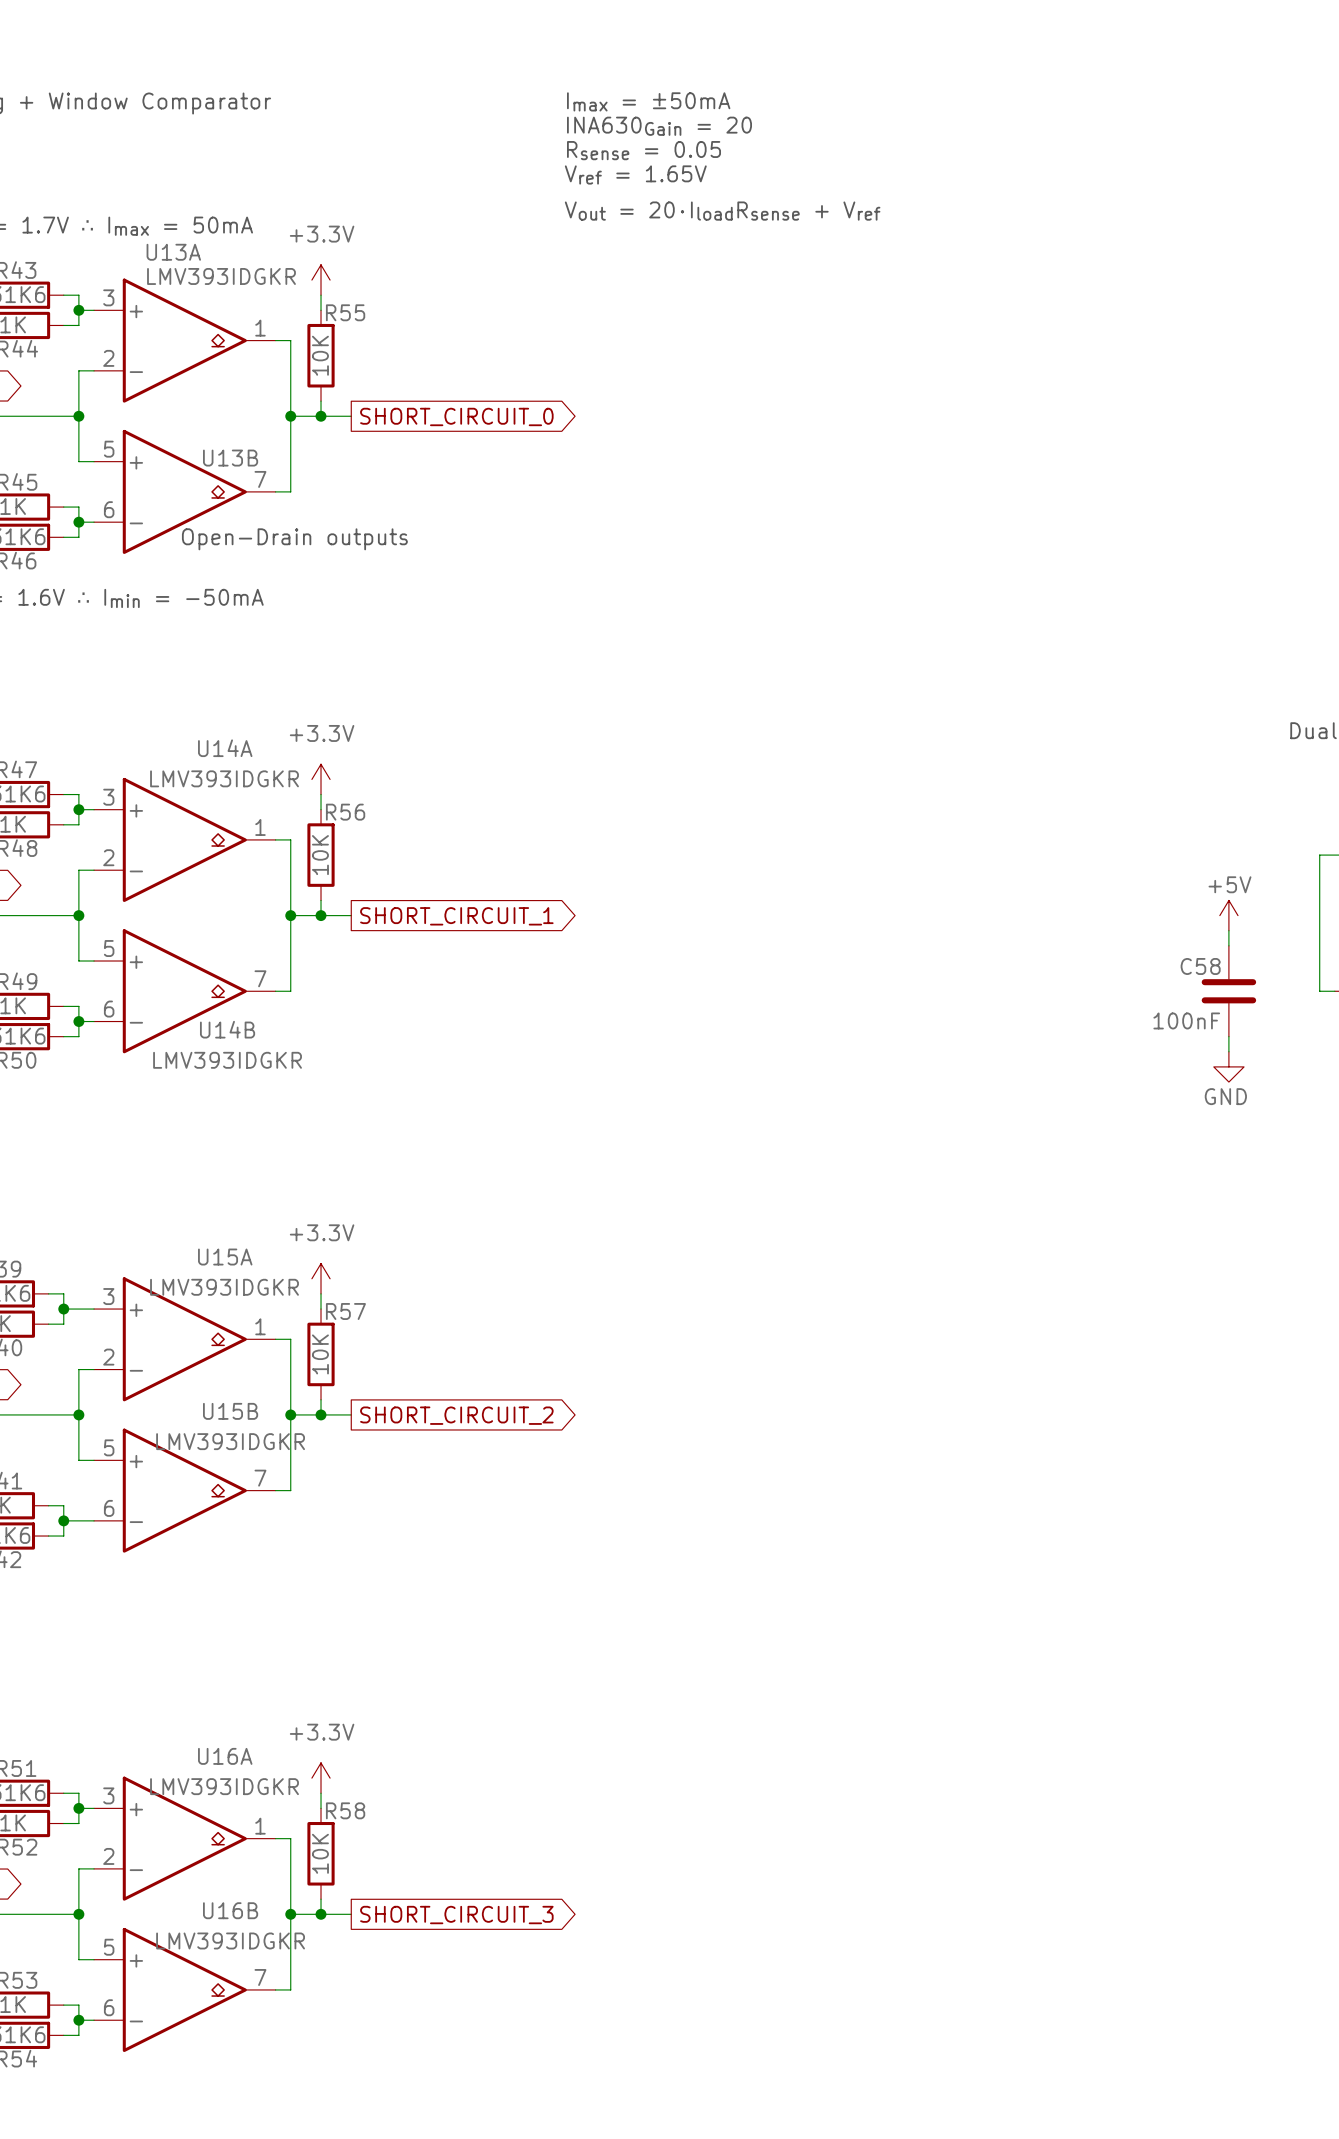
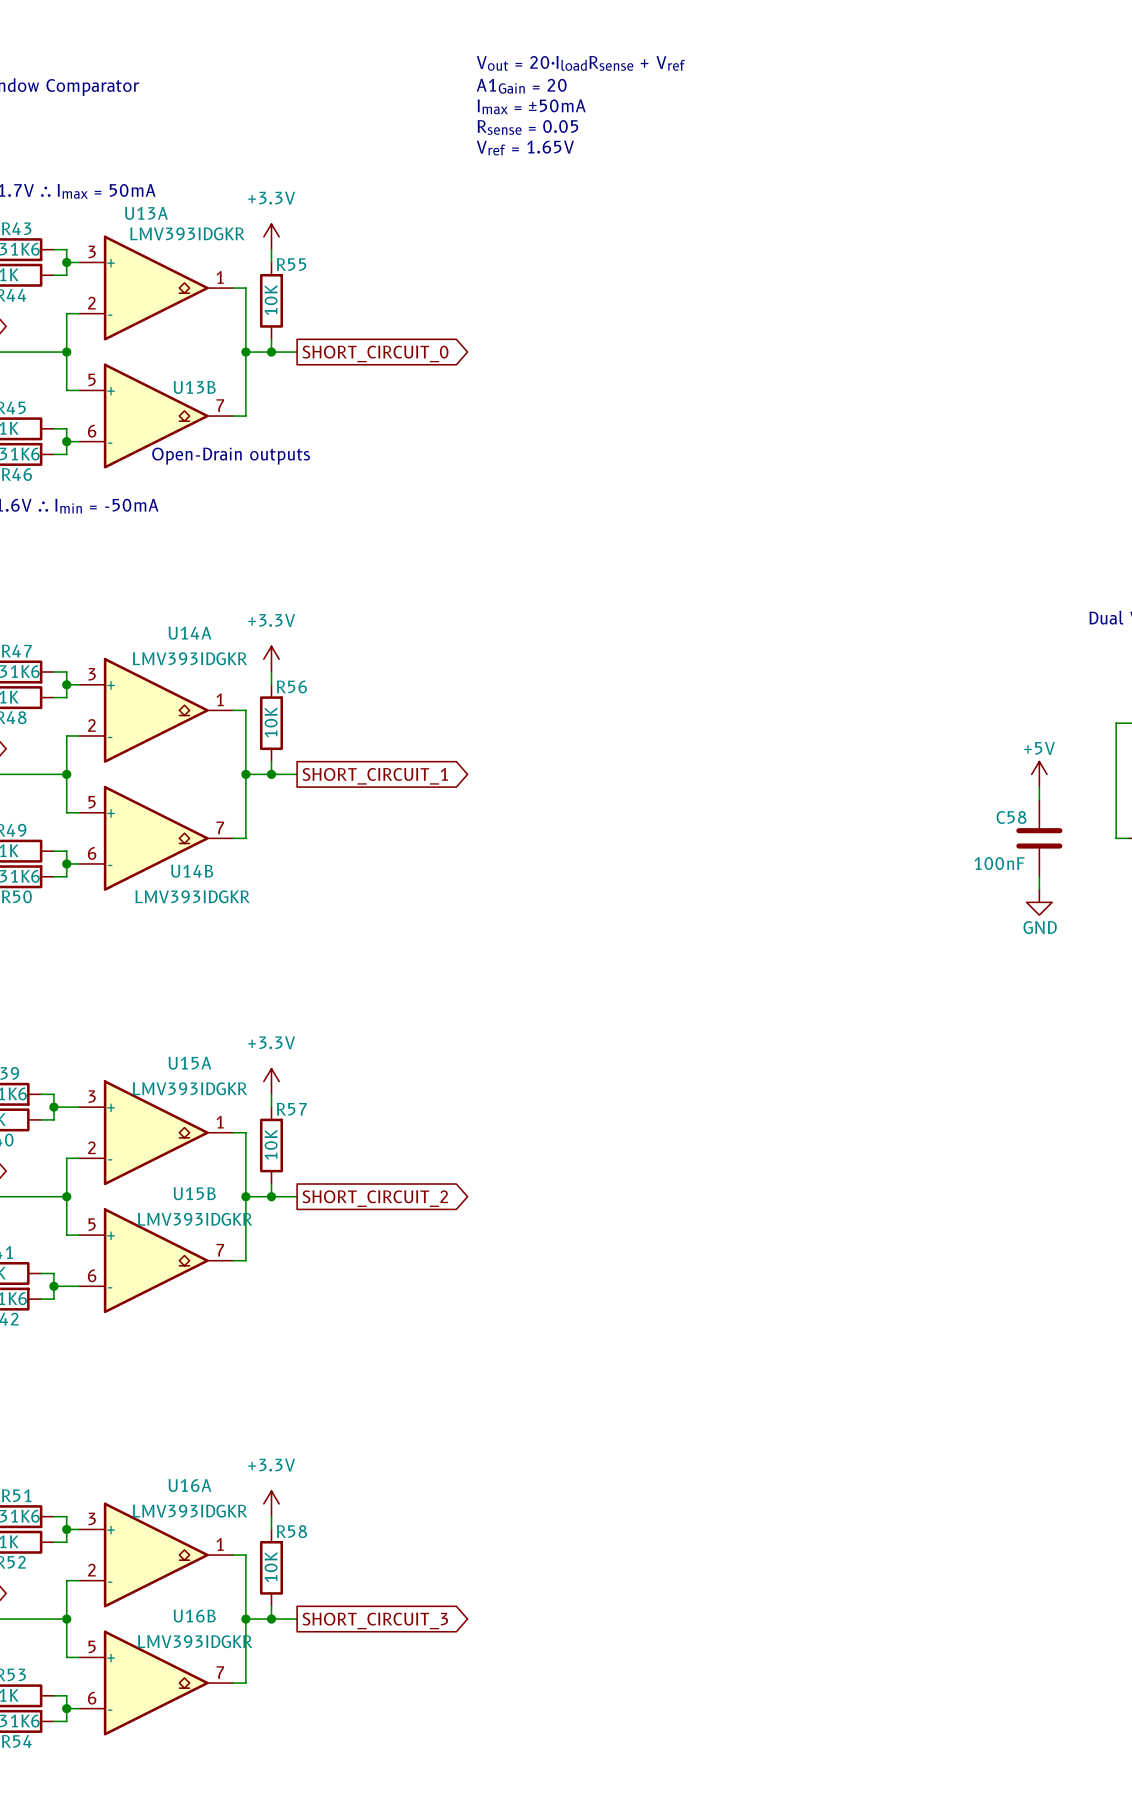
text: Imax = ±50mA (648, 101) -> A1Gain = 20 (521, 86)
text: INA630Gain = 20 (659, 126) -> Imax = ±50mA (531, 106)
text position: Vout = 20·IloadRsense + Vref (722, 211) -> Vout = 20·IloadRsense + Vref (580, 63)

